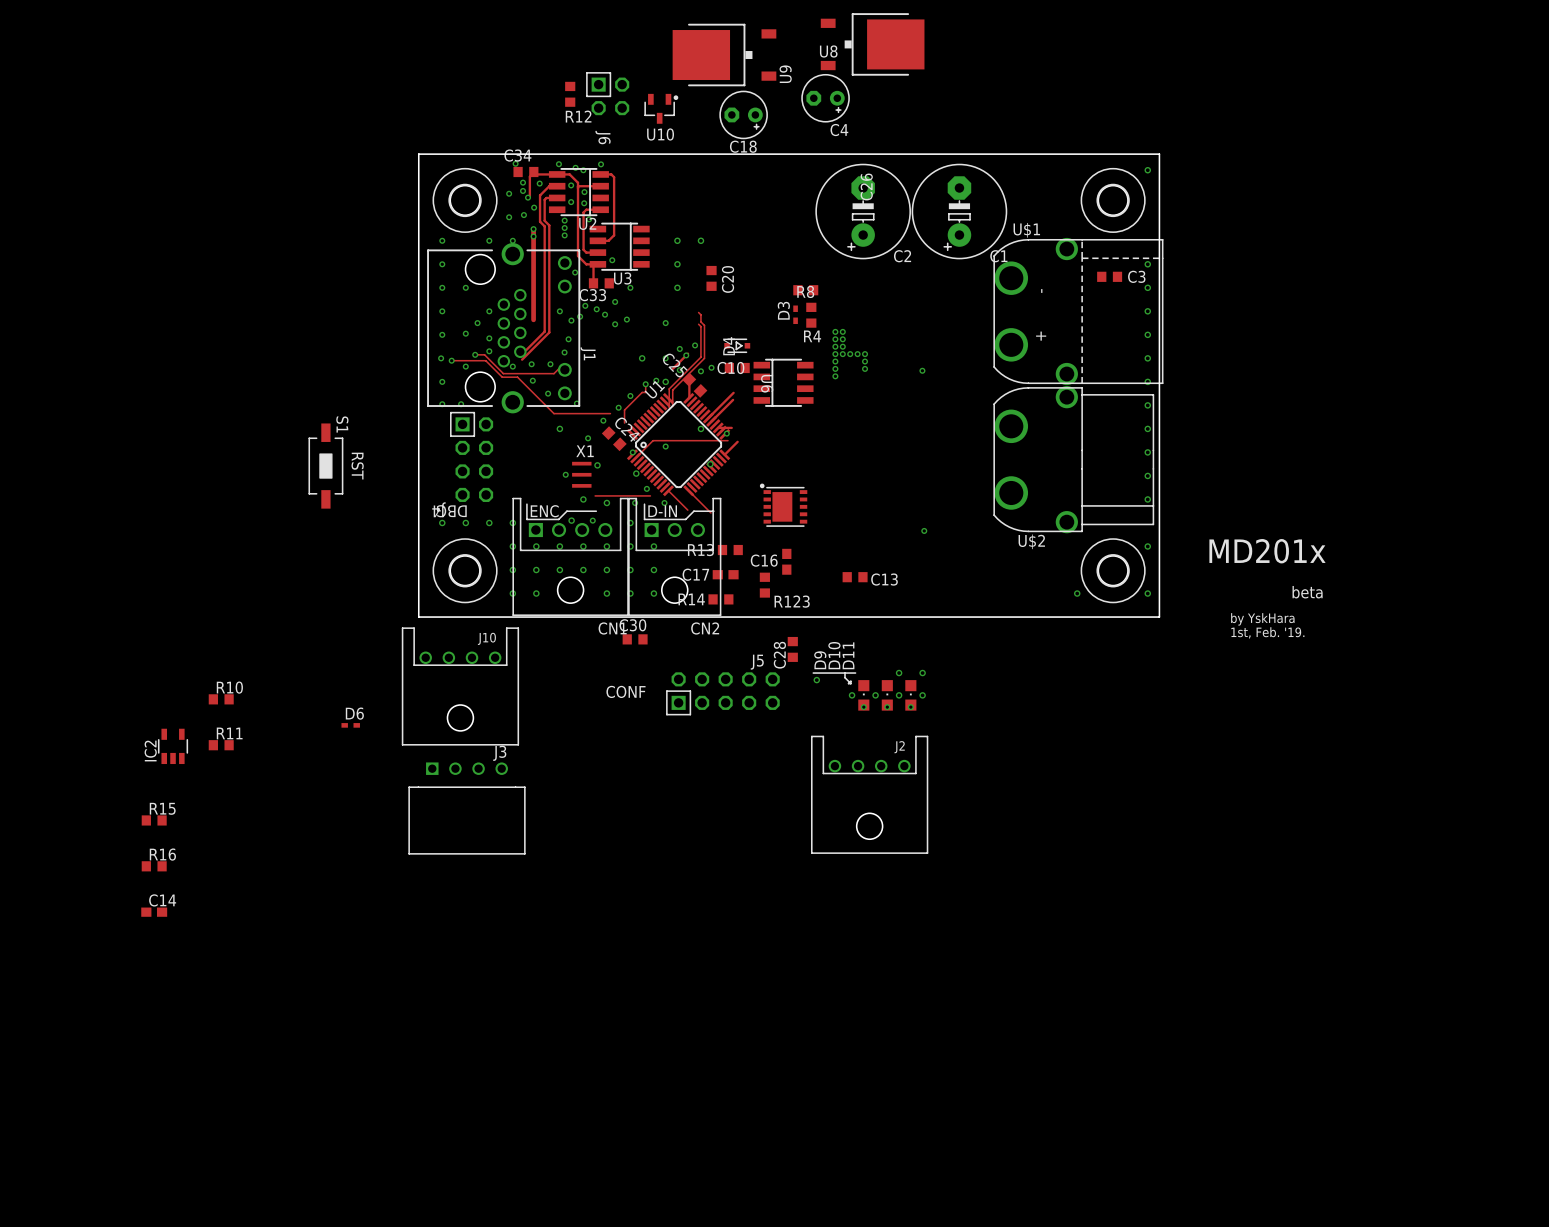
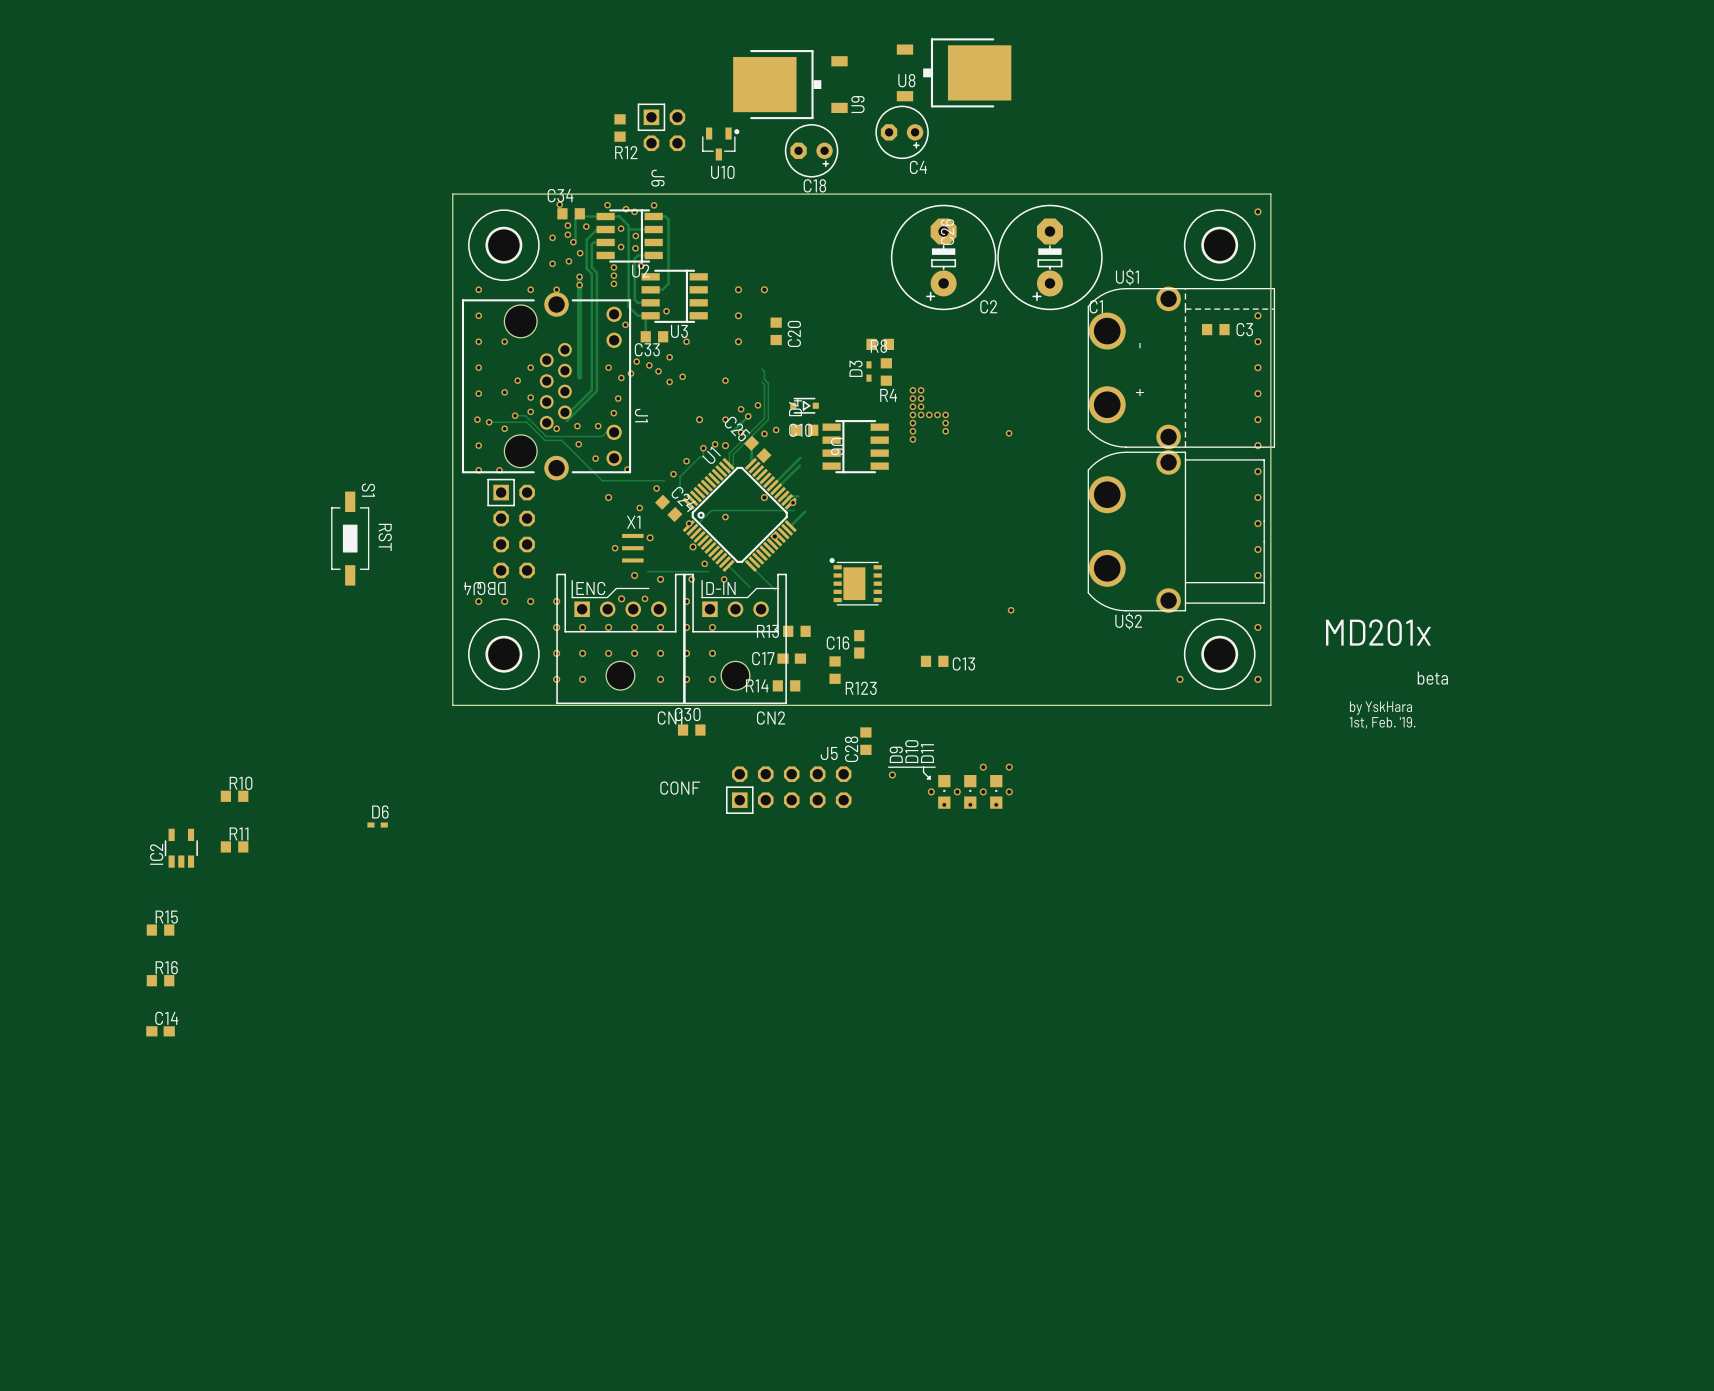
J10: (460, 686) -> none
J2: (869, 794) -> none
J3: (467, 808) -> none

